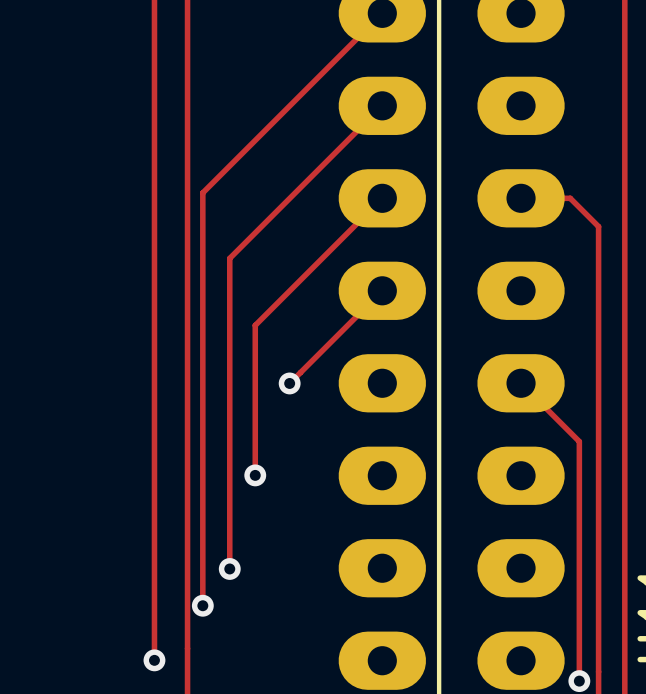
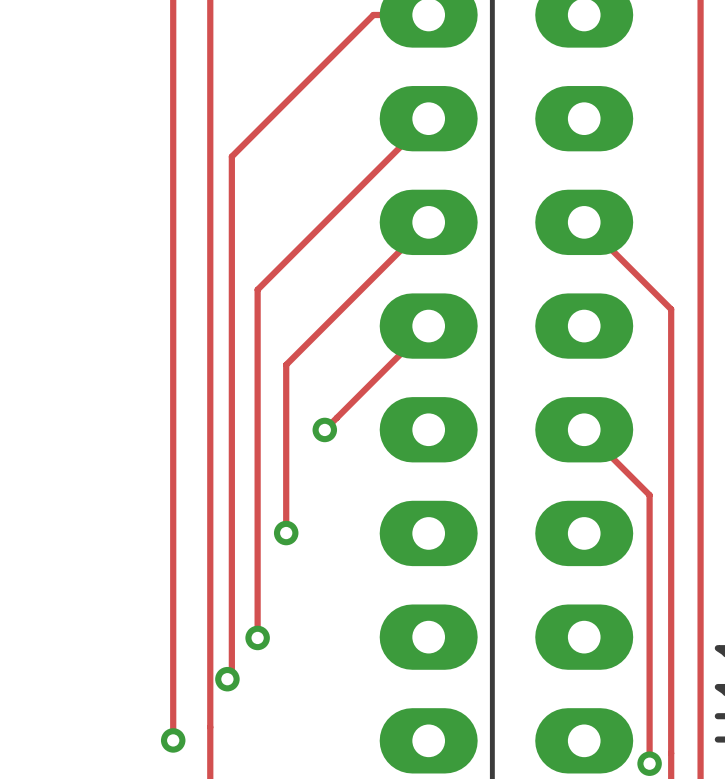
track: (382, 13) (202, 192) (202, 605) -> (428, 14) (373, 14) (231, 156) (231, 679)
track: (521, 198) (570, 198) (598, 226) (598, 275) -> (584, 222) (671, 309)

